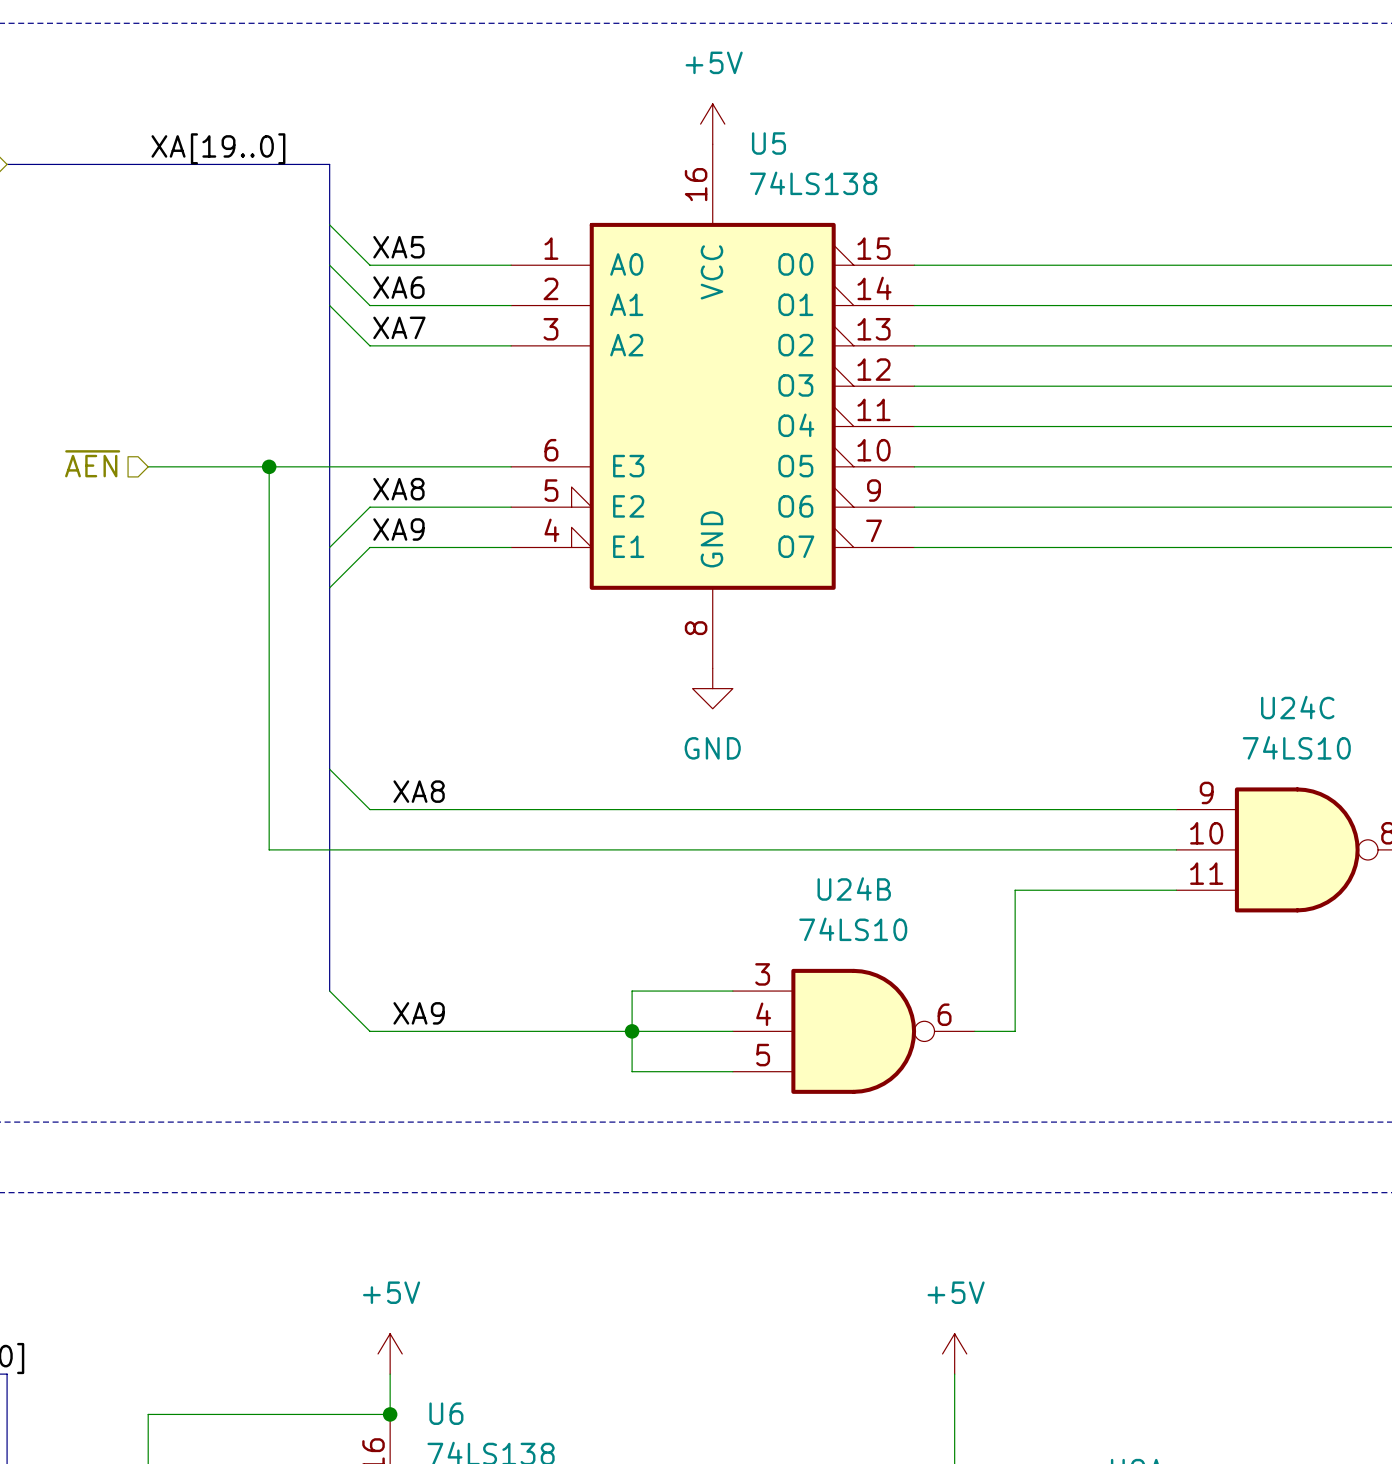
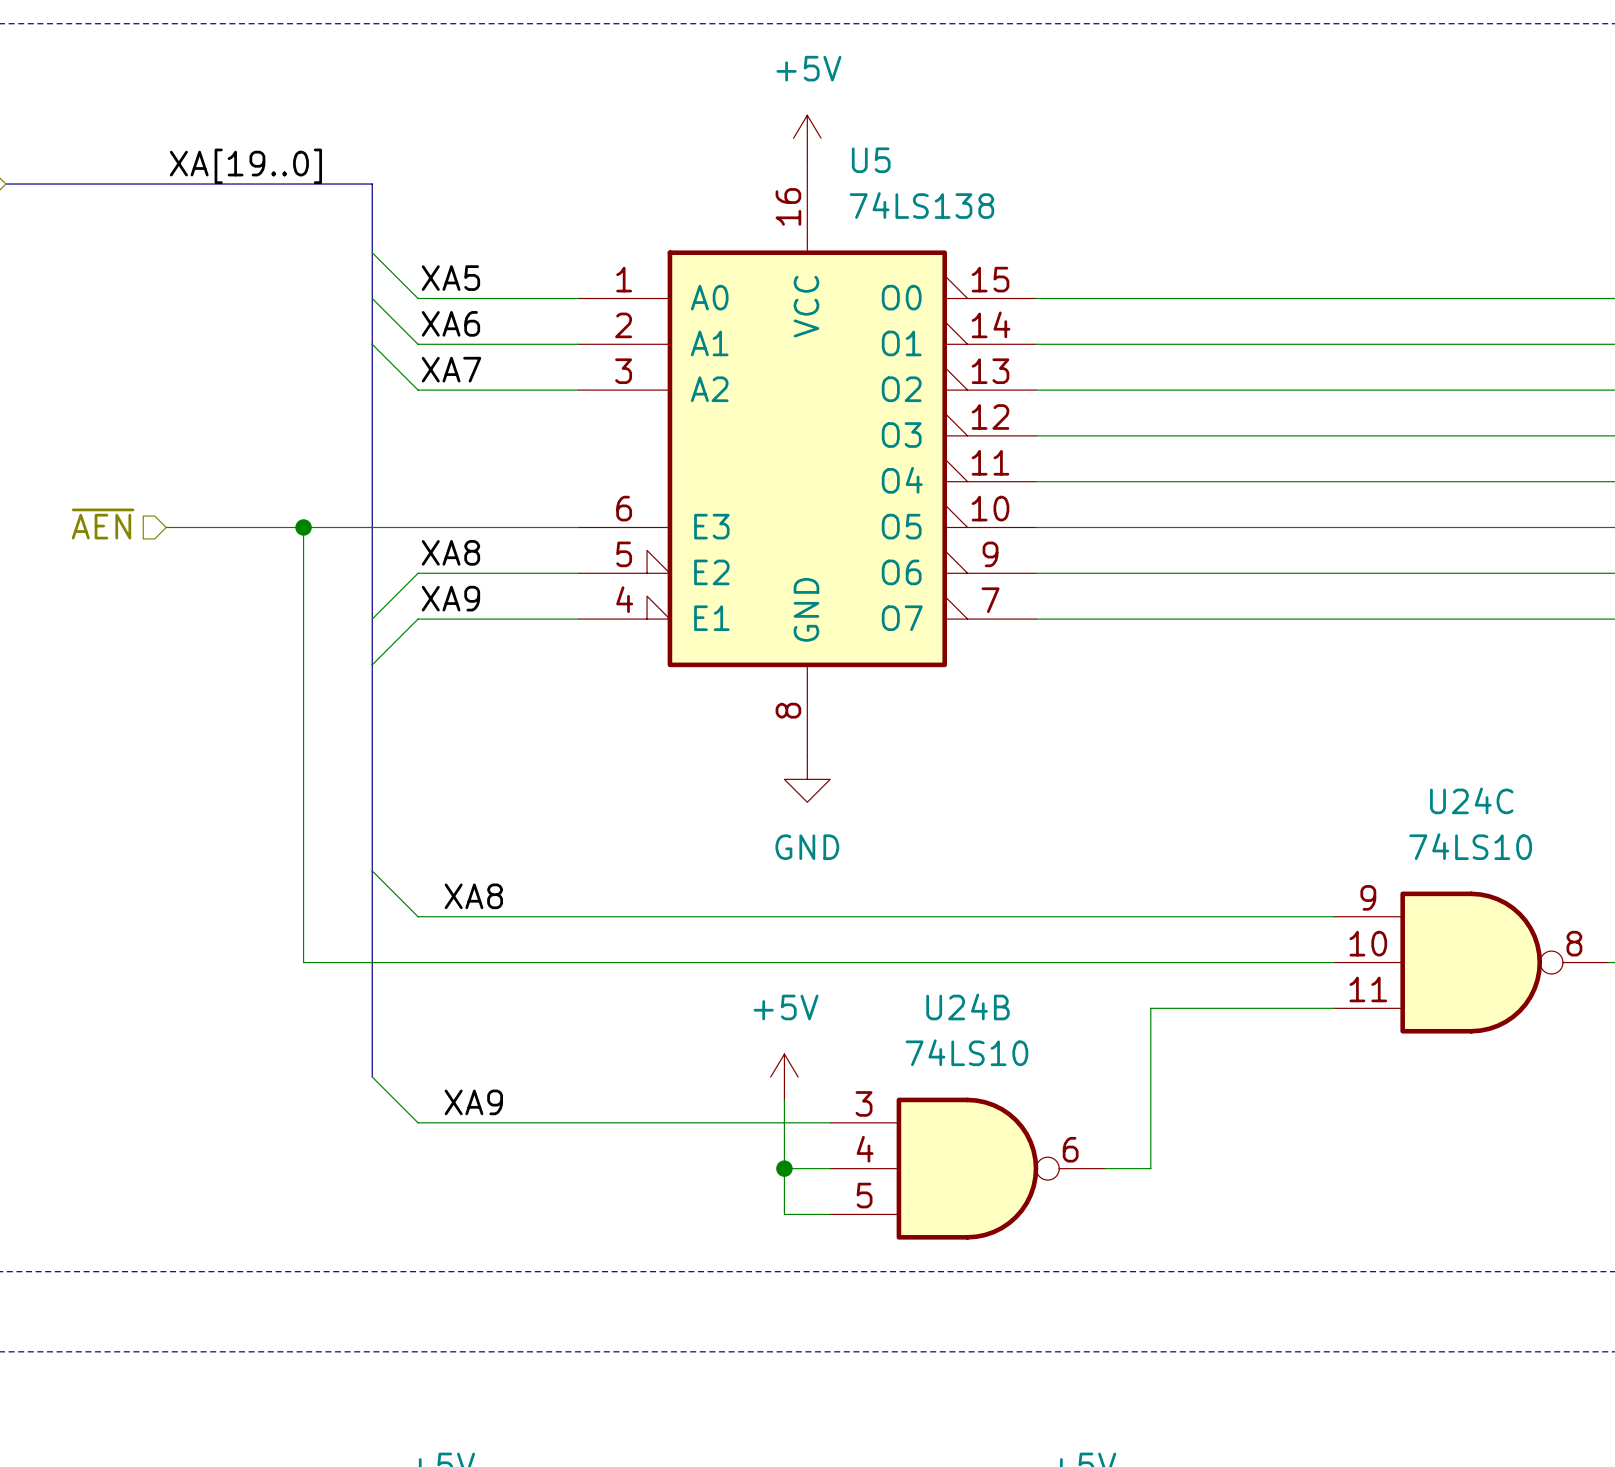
wire: none -> (372, 1077) (418, 1122) (715, 1122)
bus: (329, 950) (329, 991) -> none
power symbol: none -> +5V (784, 1077)
wire: (329, 991) (369, 1031) (692, 1031) -> none
wire: (632, 991) (632, 1071) (692, 1071) -> (784, 1099) (784, 1214)
label position: XA9 (419, 1013) -> XA9 (473, 1102)
junction position: (632, 1031) -> (784, 1168)

